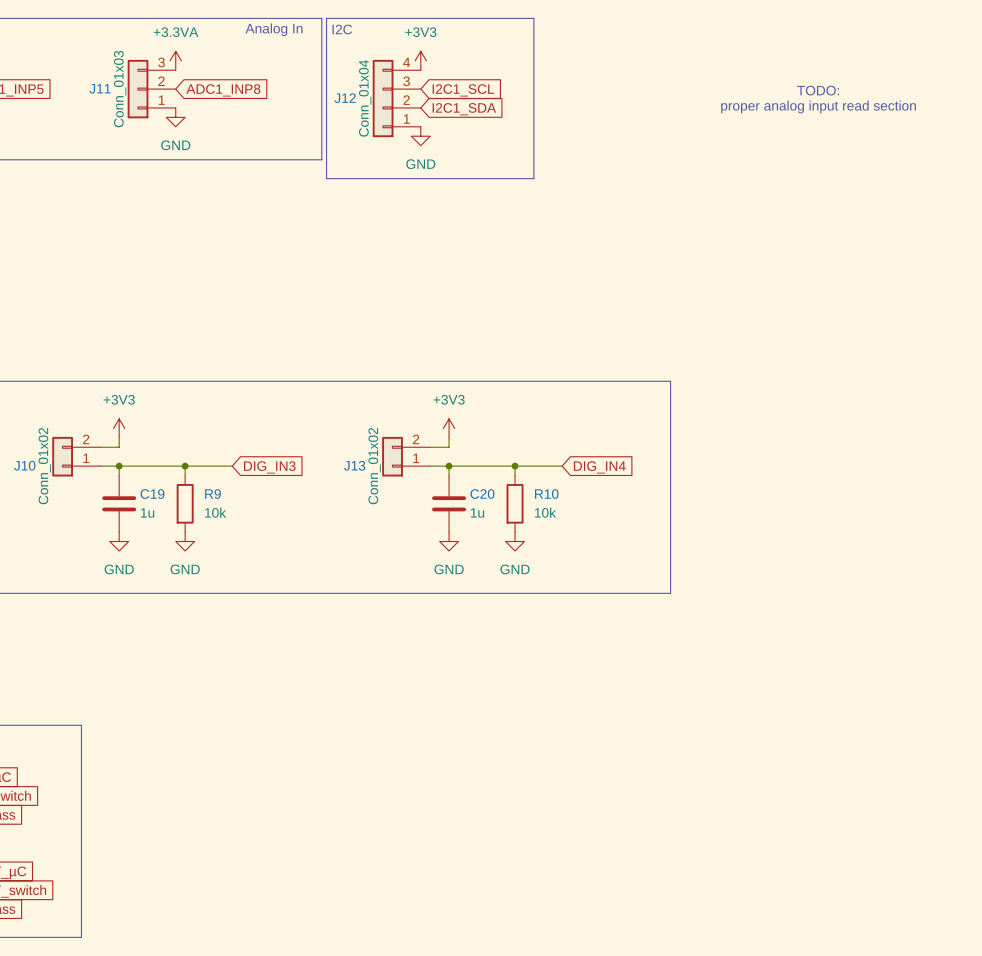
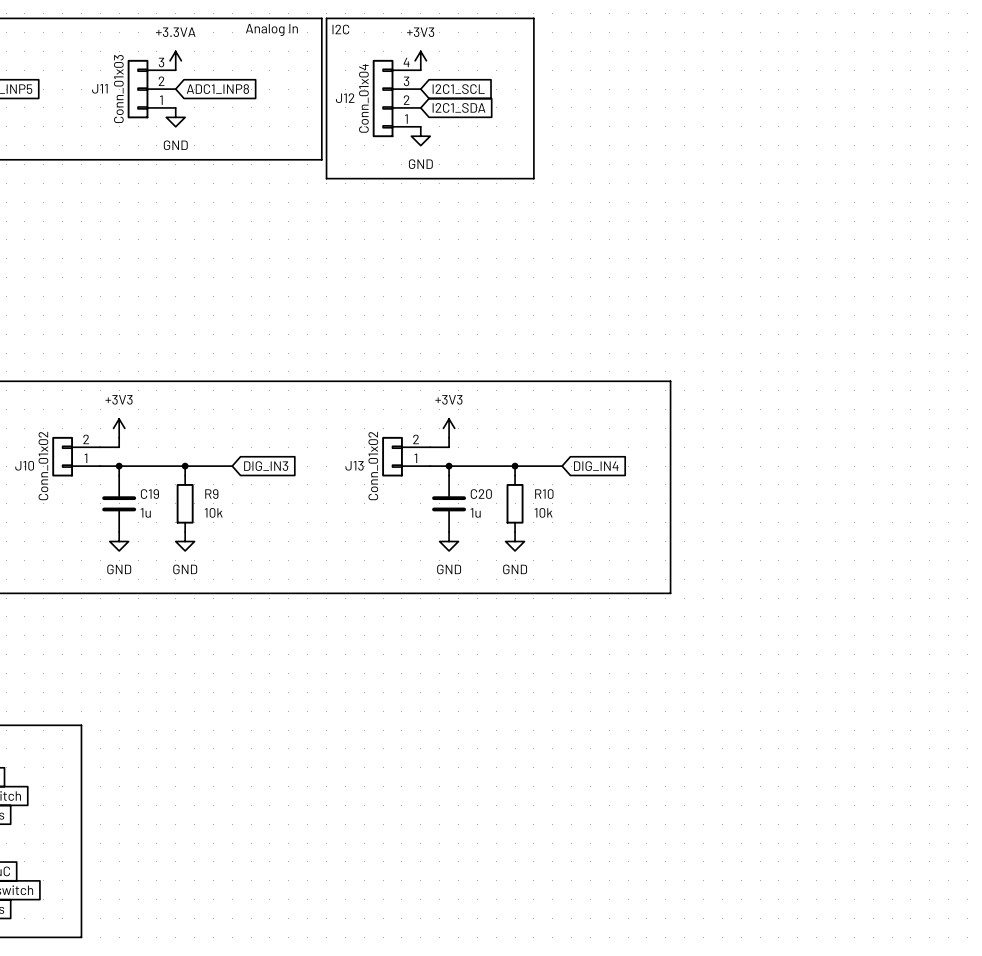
text: TODO: (818, 90) -> none
text: proper analog input read section (818, 106) -> none

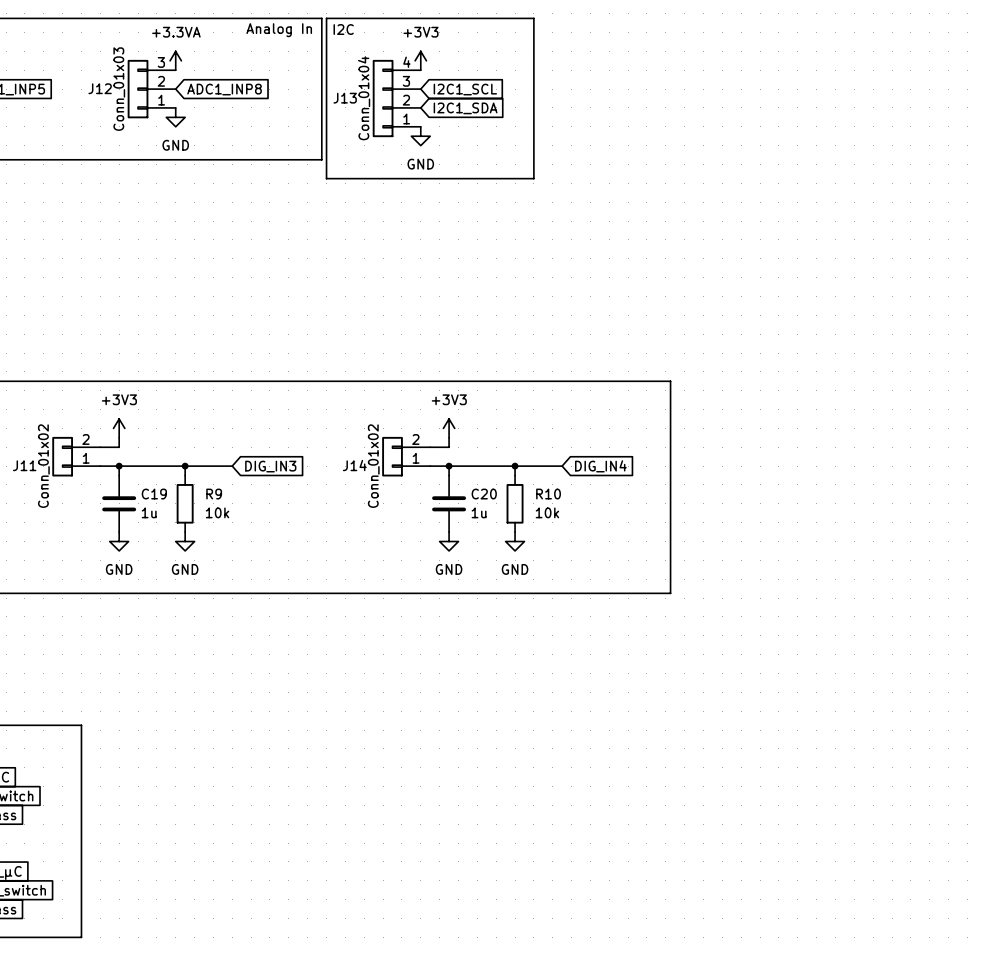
J11 name: J11 (99, 88) -> J12 (100, 88)
J12 name: J12 (345, 98) -> J13 (345, 98)
J10 name: J10 (24, 465) -> J11 (24, 465)
J13 name: J13 (354, 465) -> J14 (354, 465)

